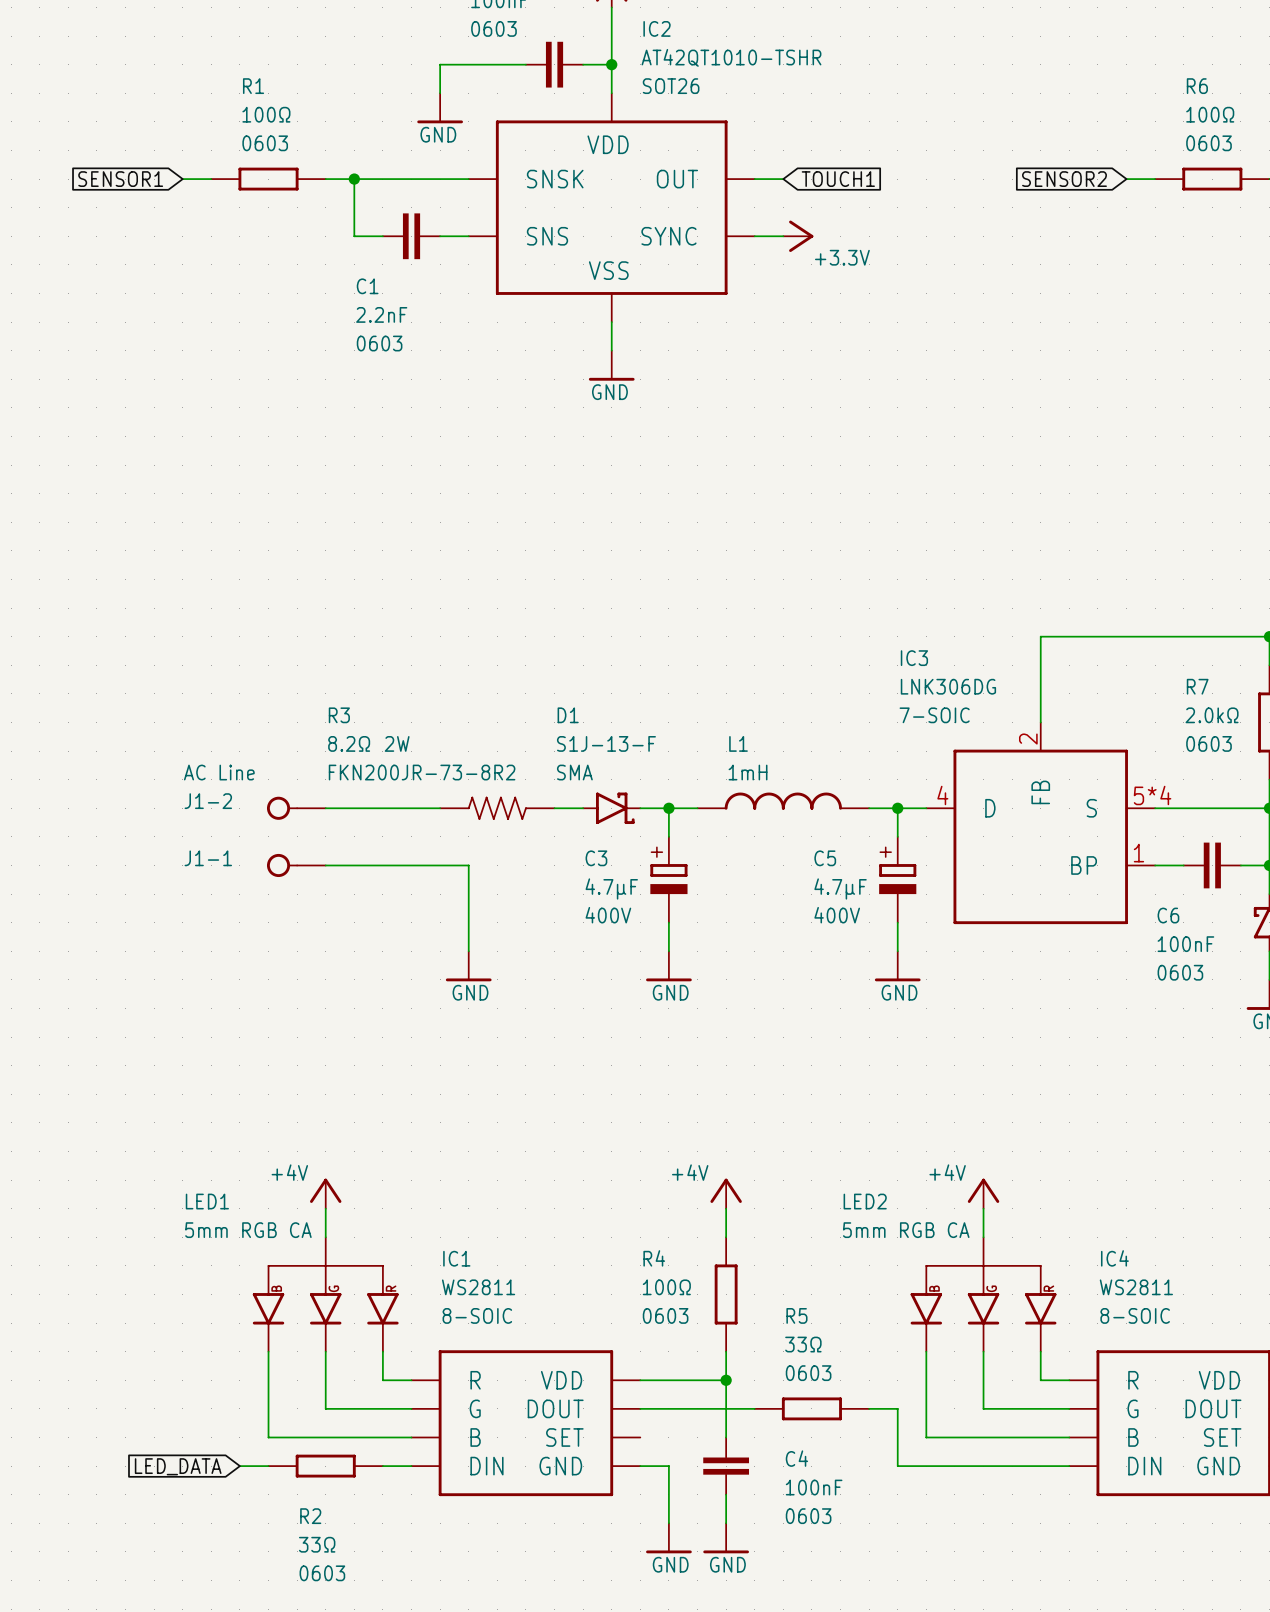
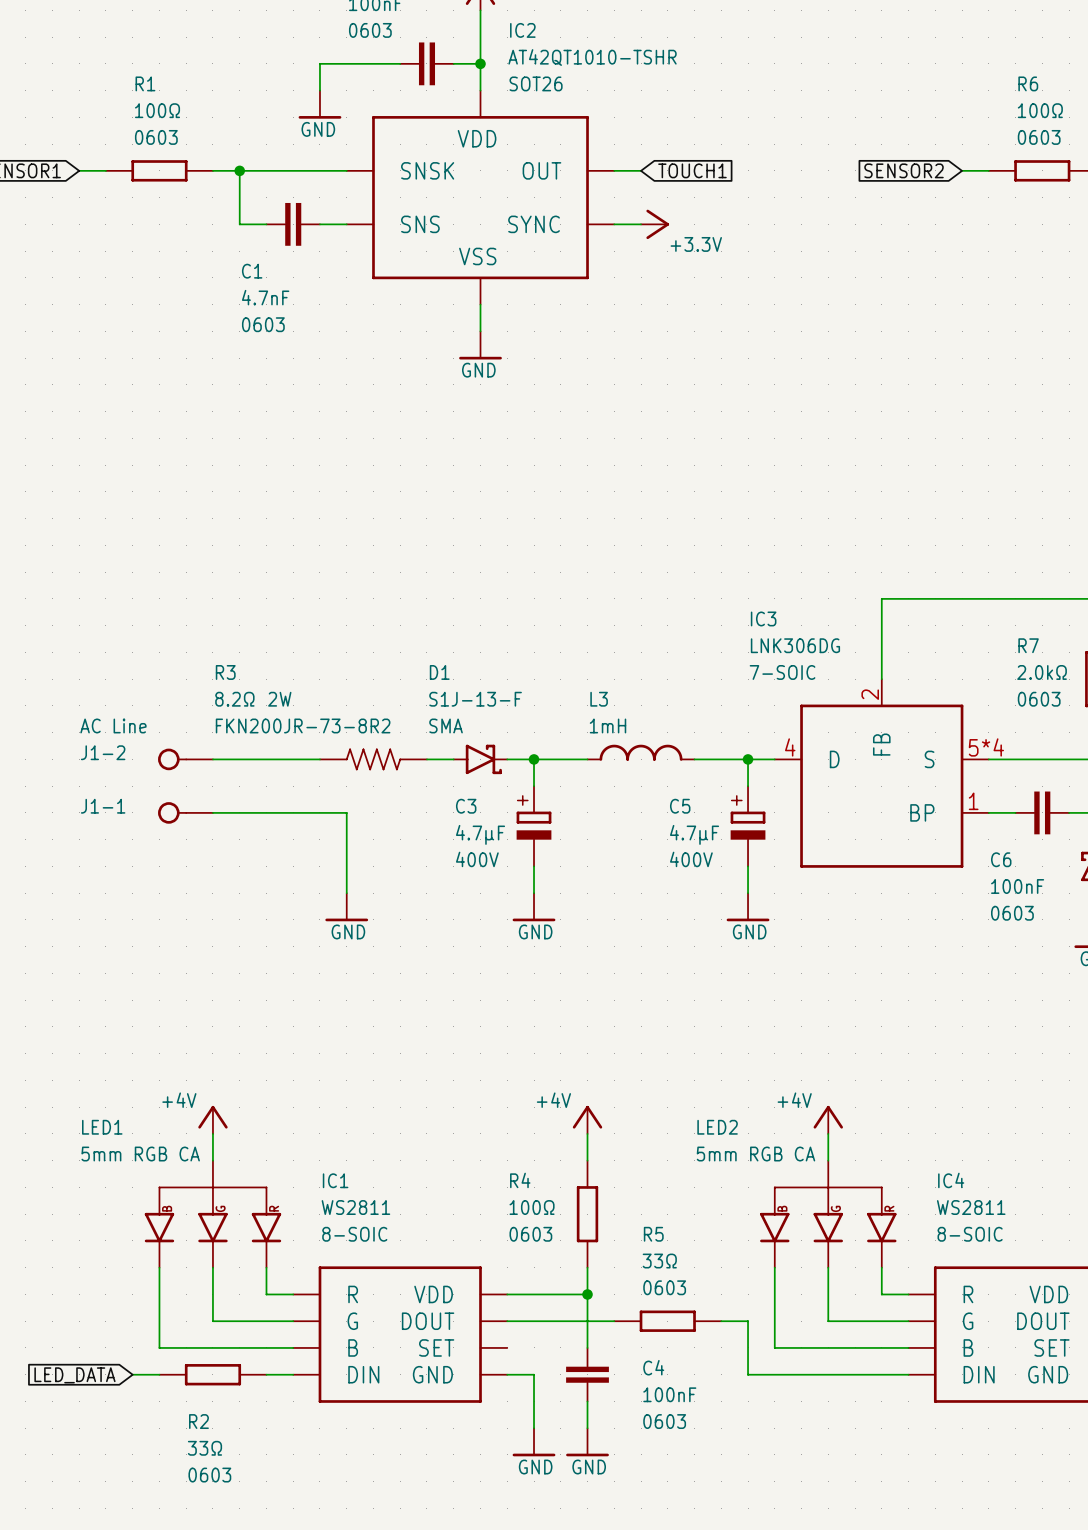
C1 value: 2.2nF (381, 314) -> 4.7nF (265, 297)
L1: 1mH (783, 801) -> none
L3: none -> 1mH (641, 752)

